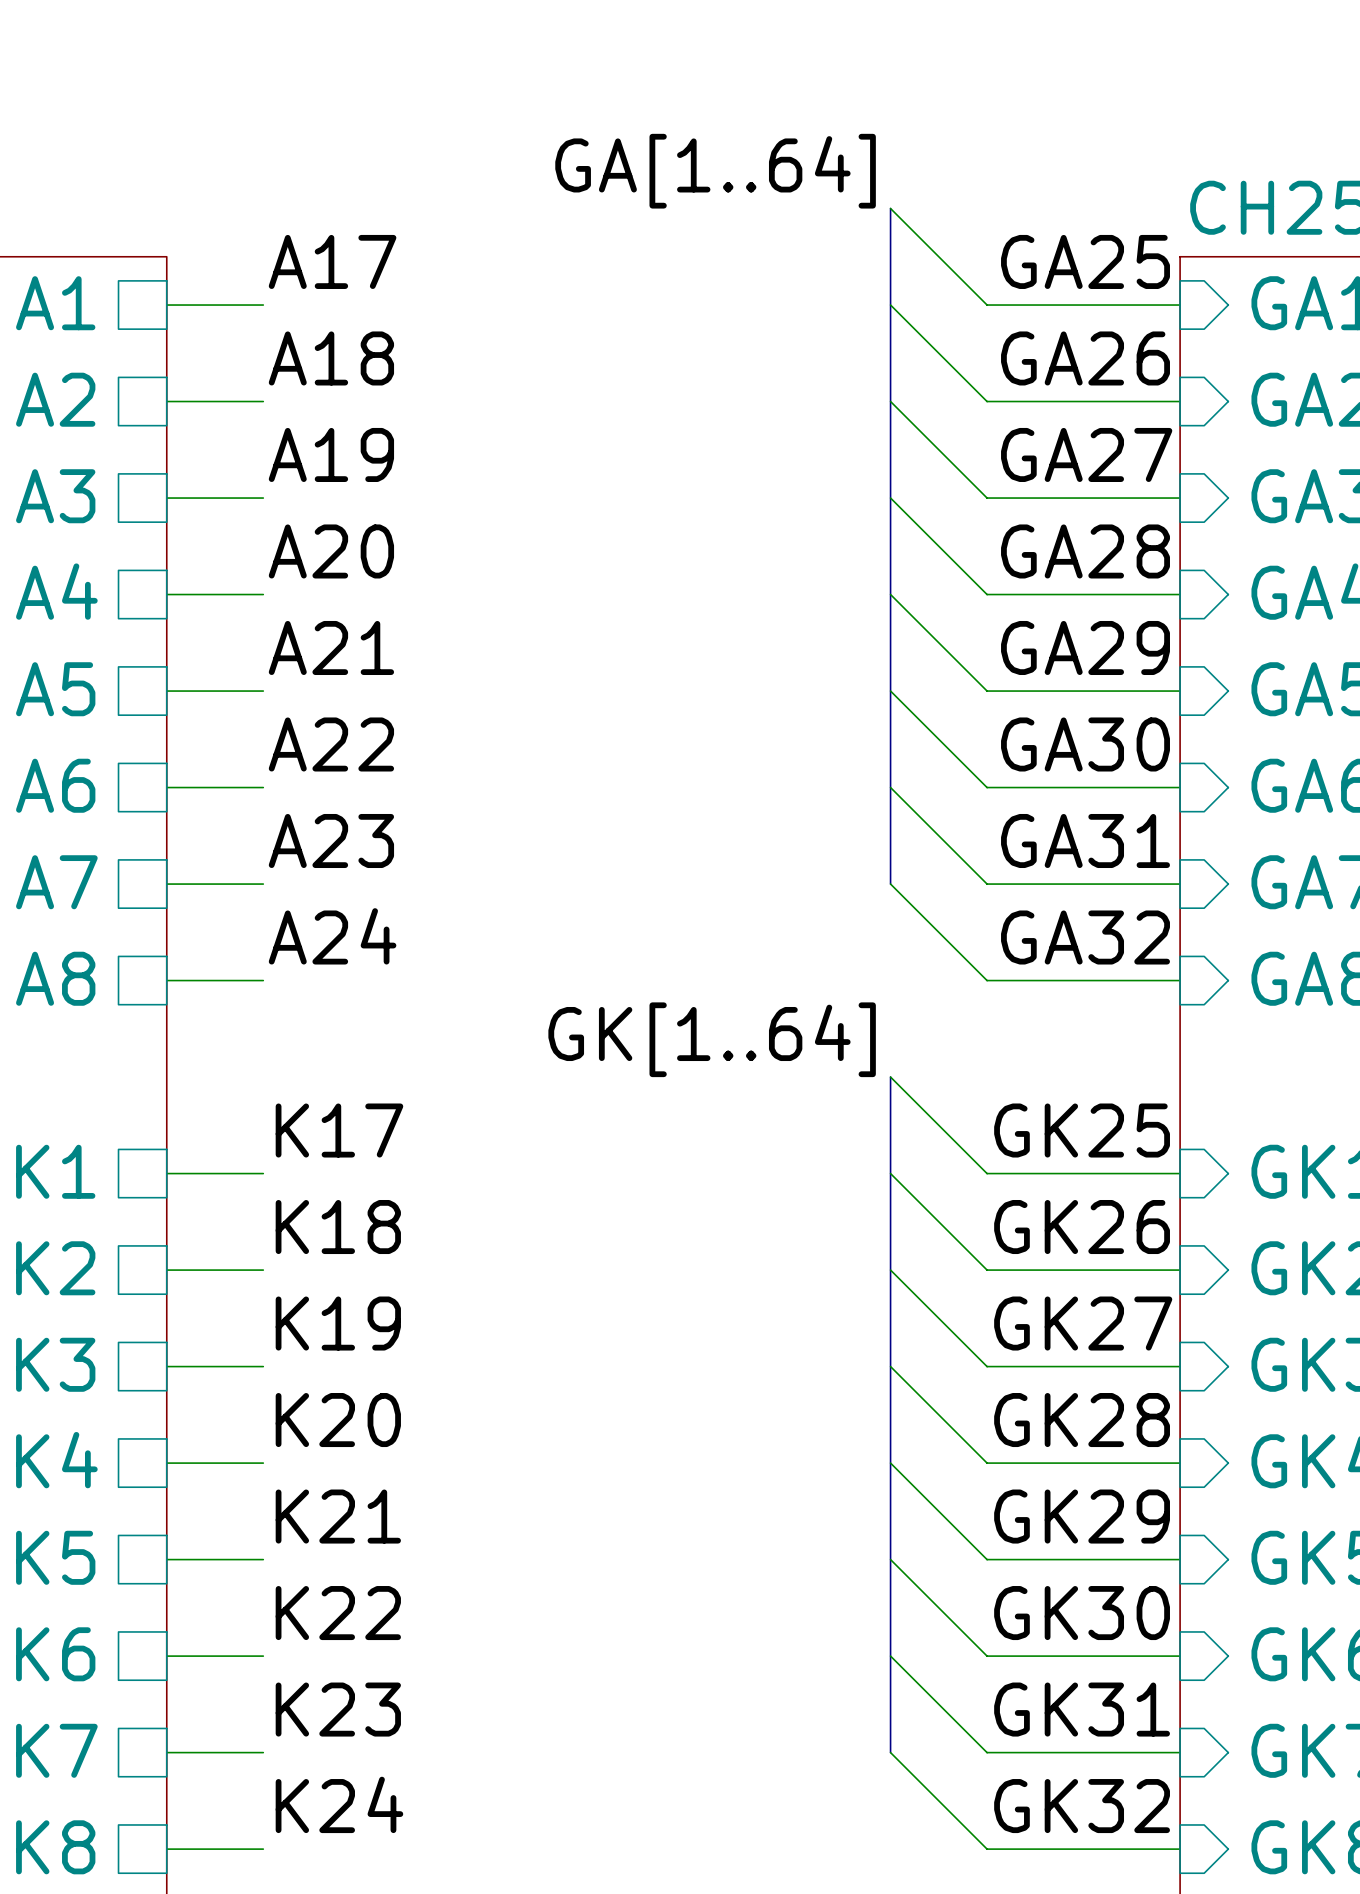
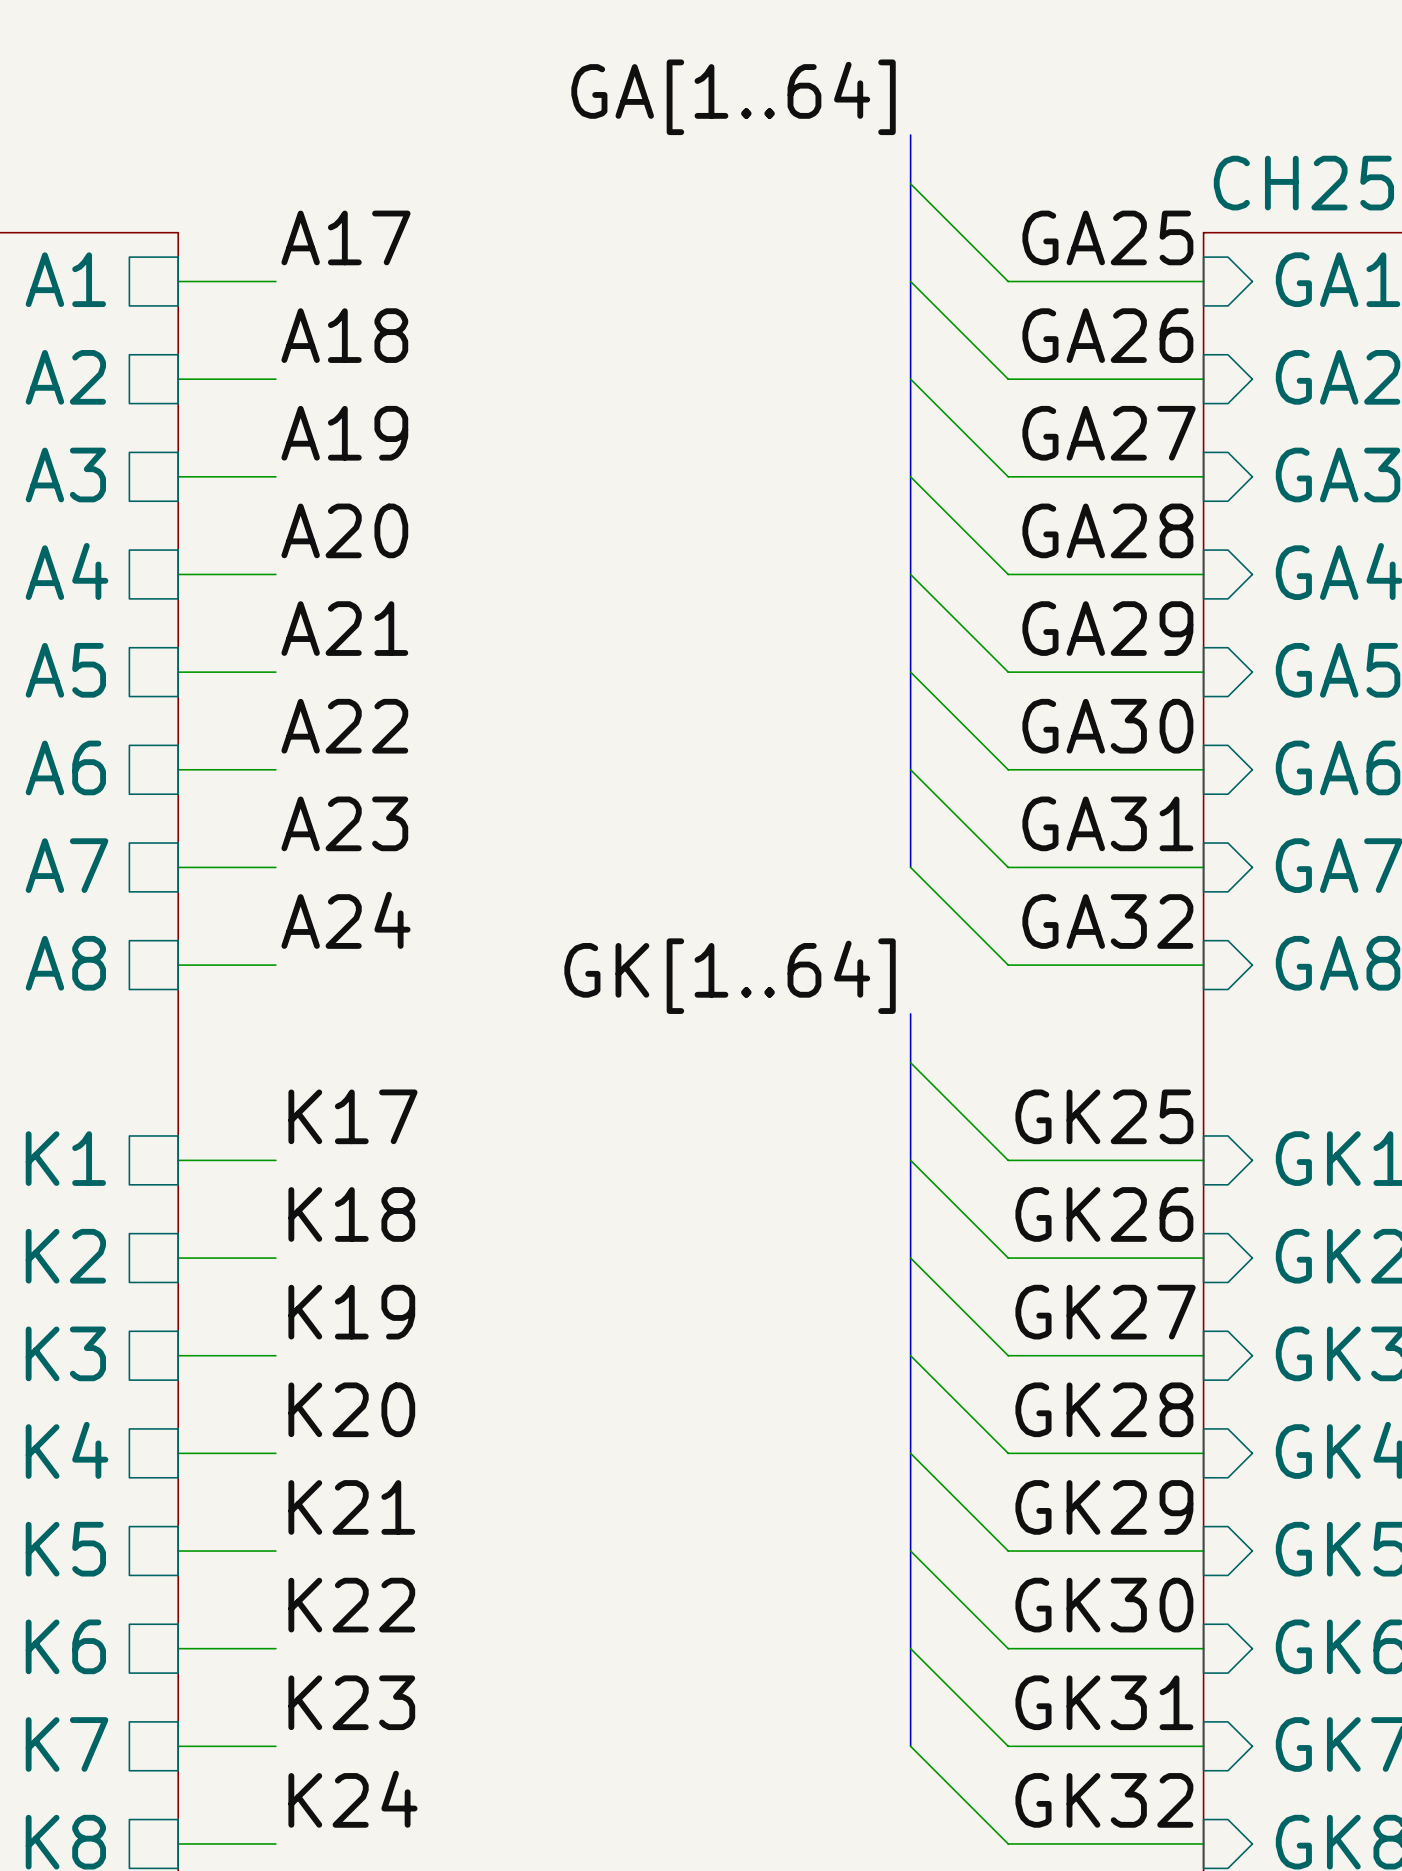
bus: none -> (910, 135) (910, 183)
label position: GA[1..64] (715, 171) -> GA[1..64] (733, 97)
bus: none -> (910, 1013) (910, 1062)
label position: GK[1..64] (712, 1039) -> GK[1..64] (730, 976)

